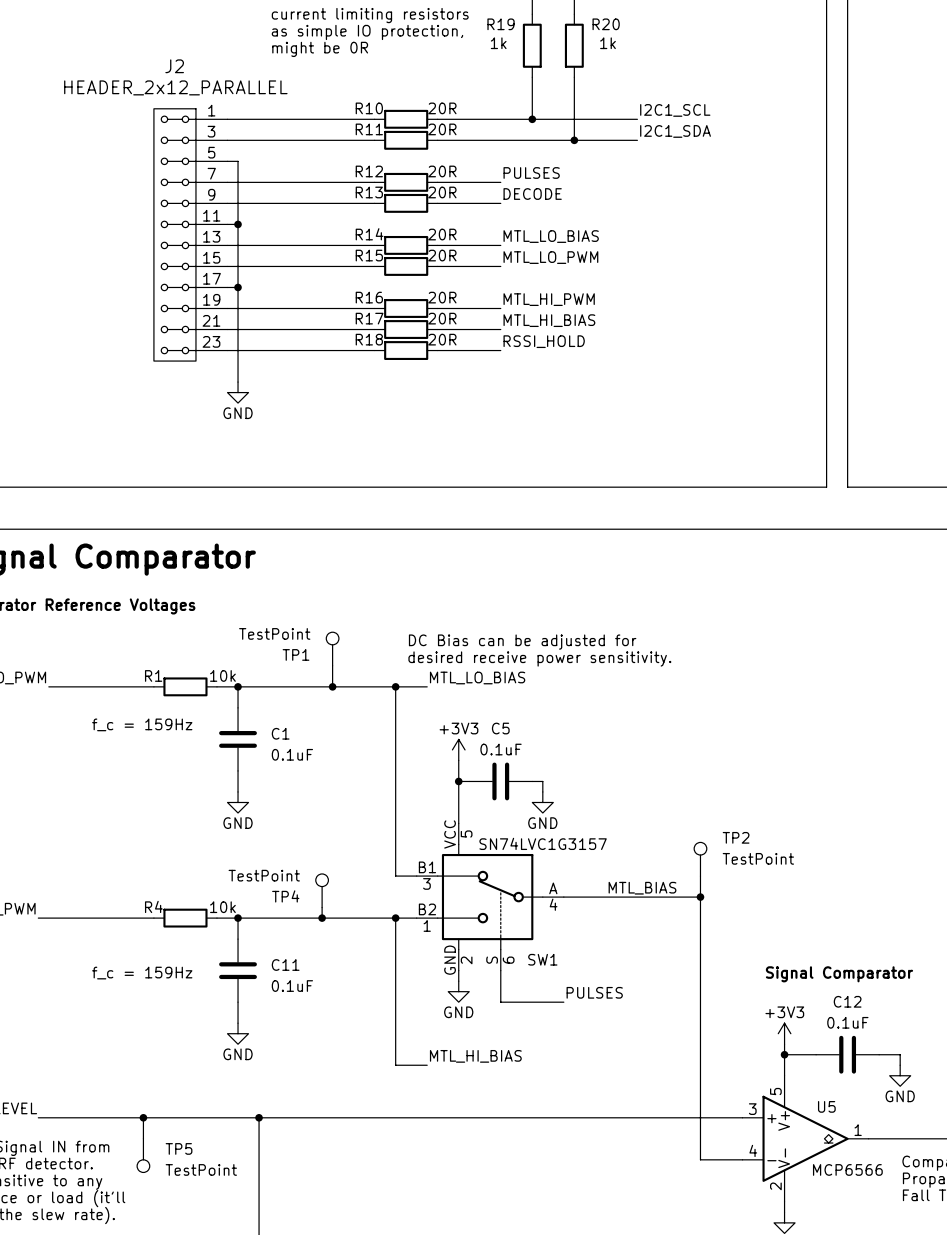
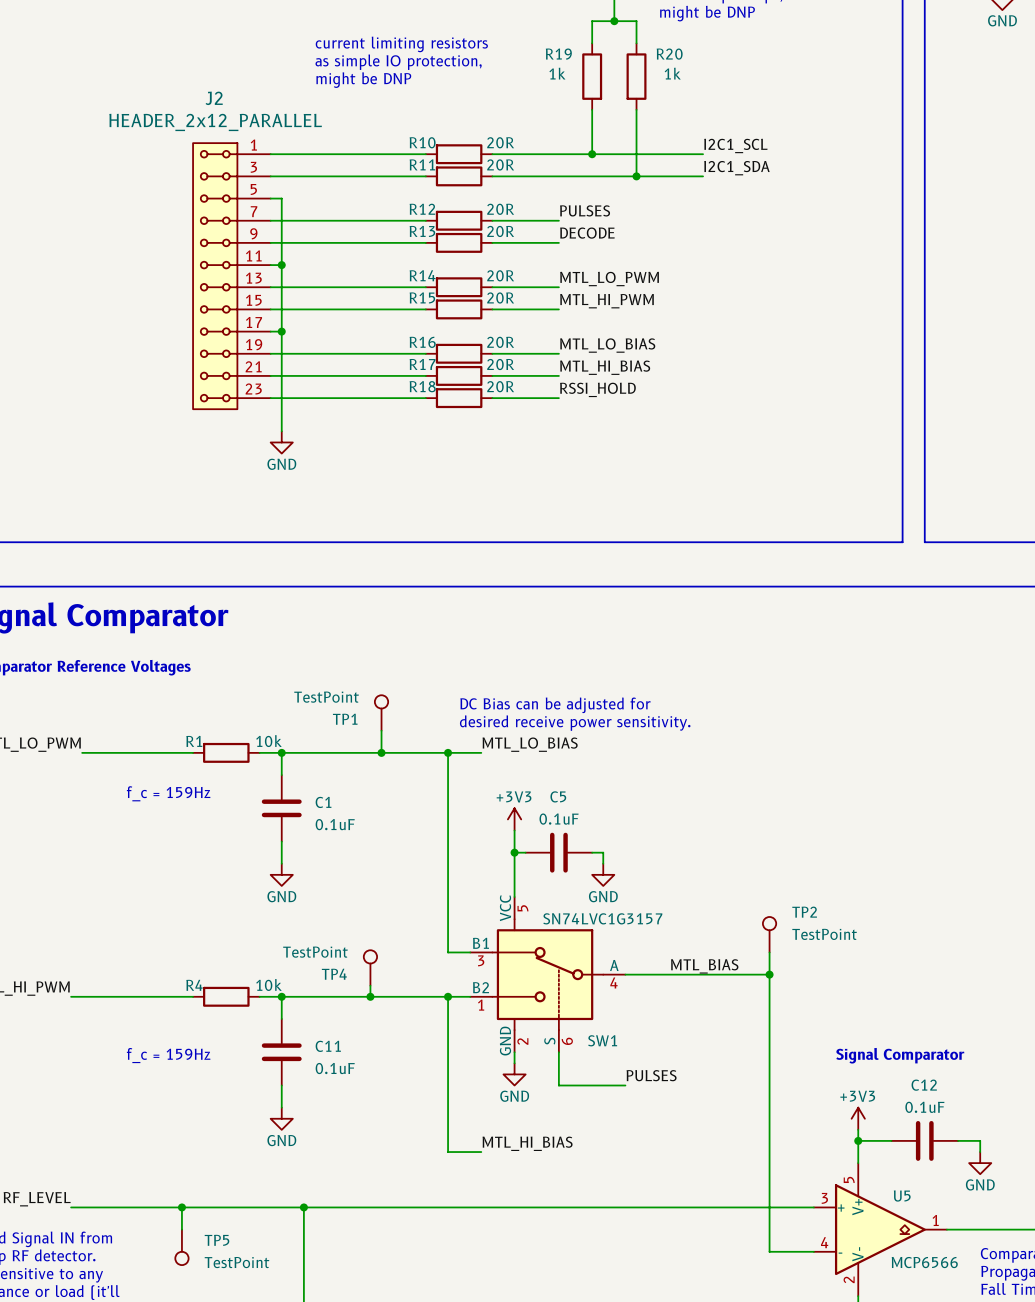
text: might be 0R (320, 49) -> might be DNP (363, 80)
label: MTL_LO_BIAS (551, 236) -> MTL_LO_PWM (609, 279)
label: MTL_LO_PWM (550, 257) -> MTL_HI_PWM (606, 301)
label: MTL_HI_PWM (549, 299) -> MTL_LO_BIAS (607, 345)

